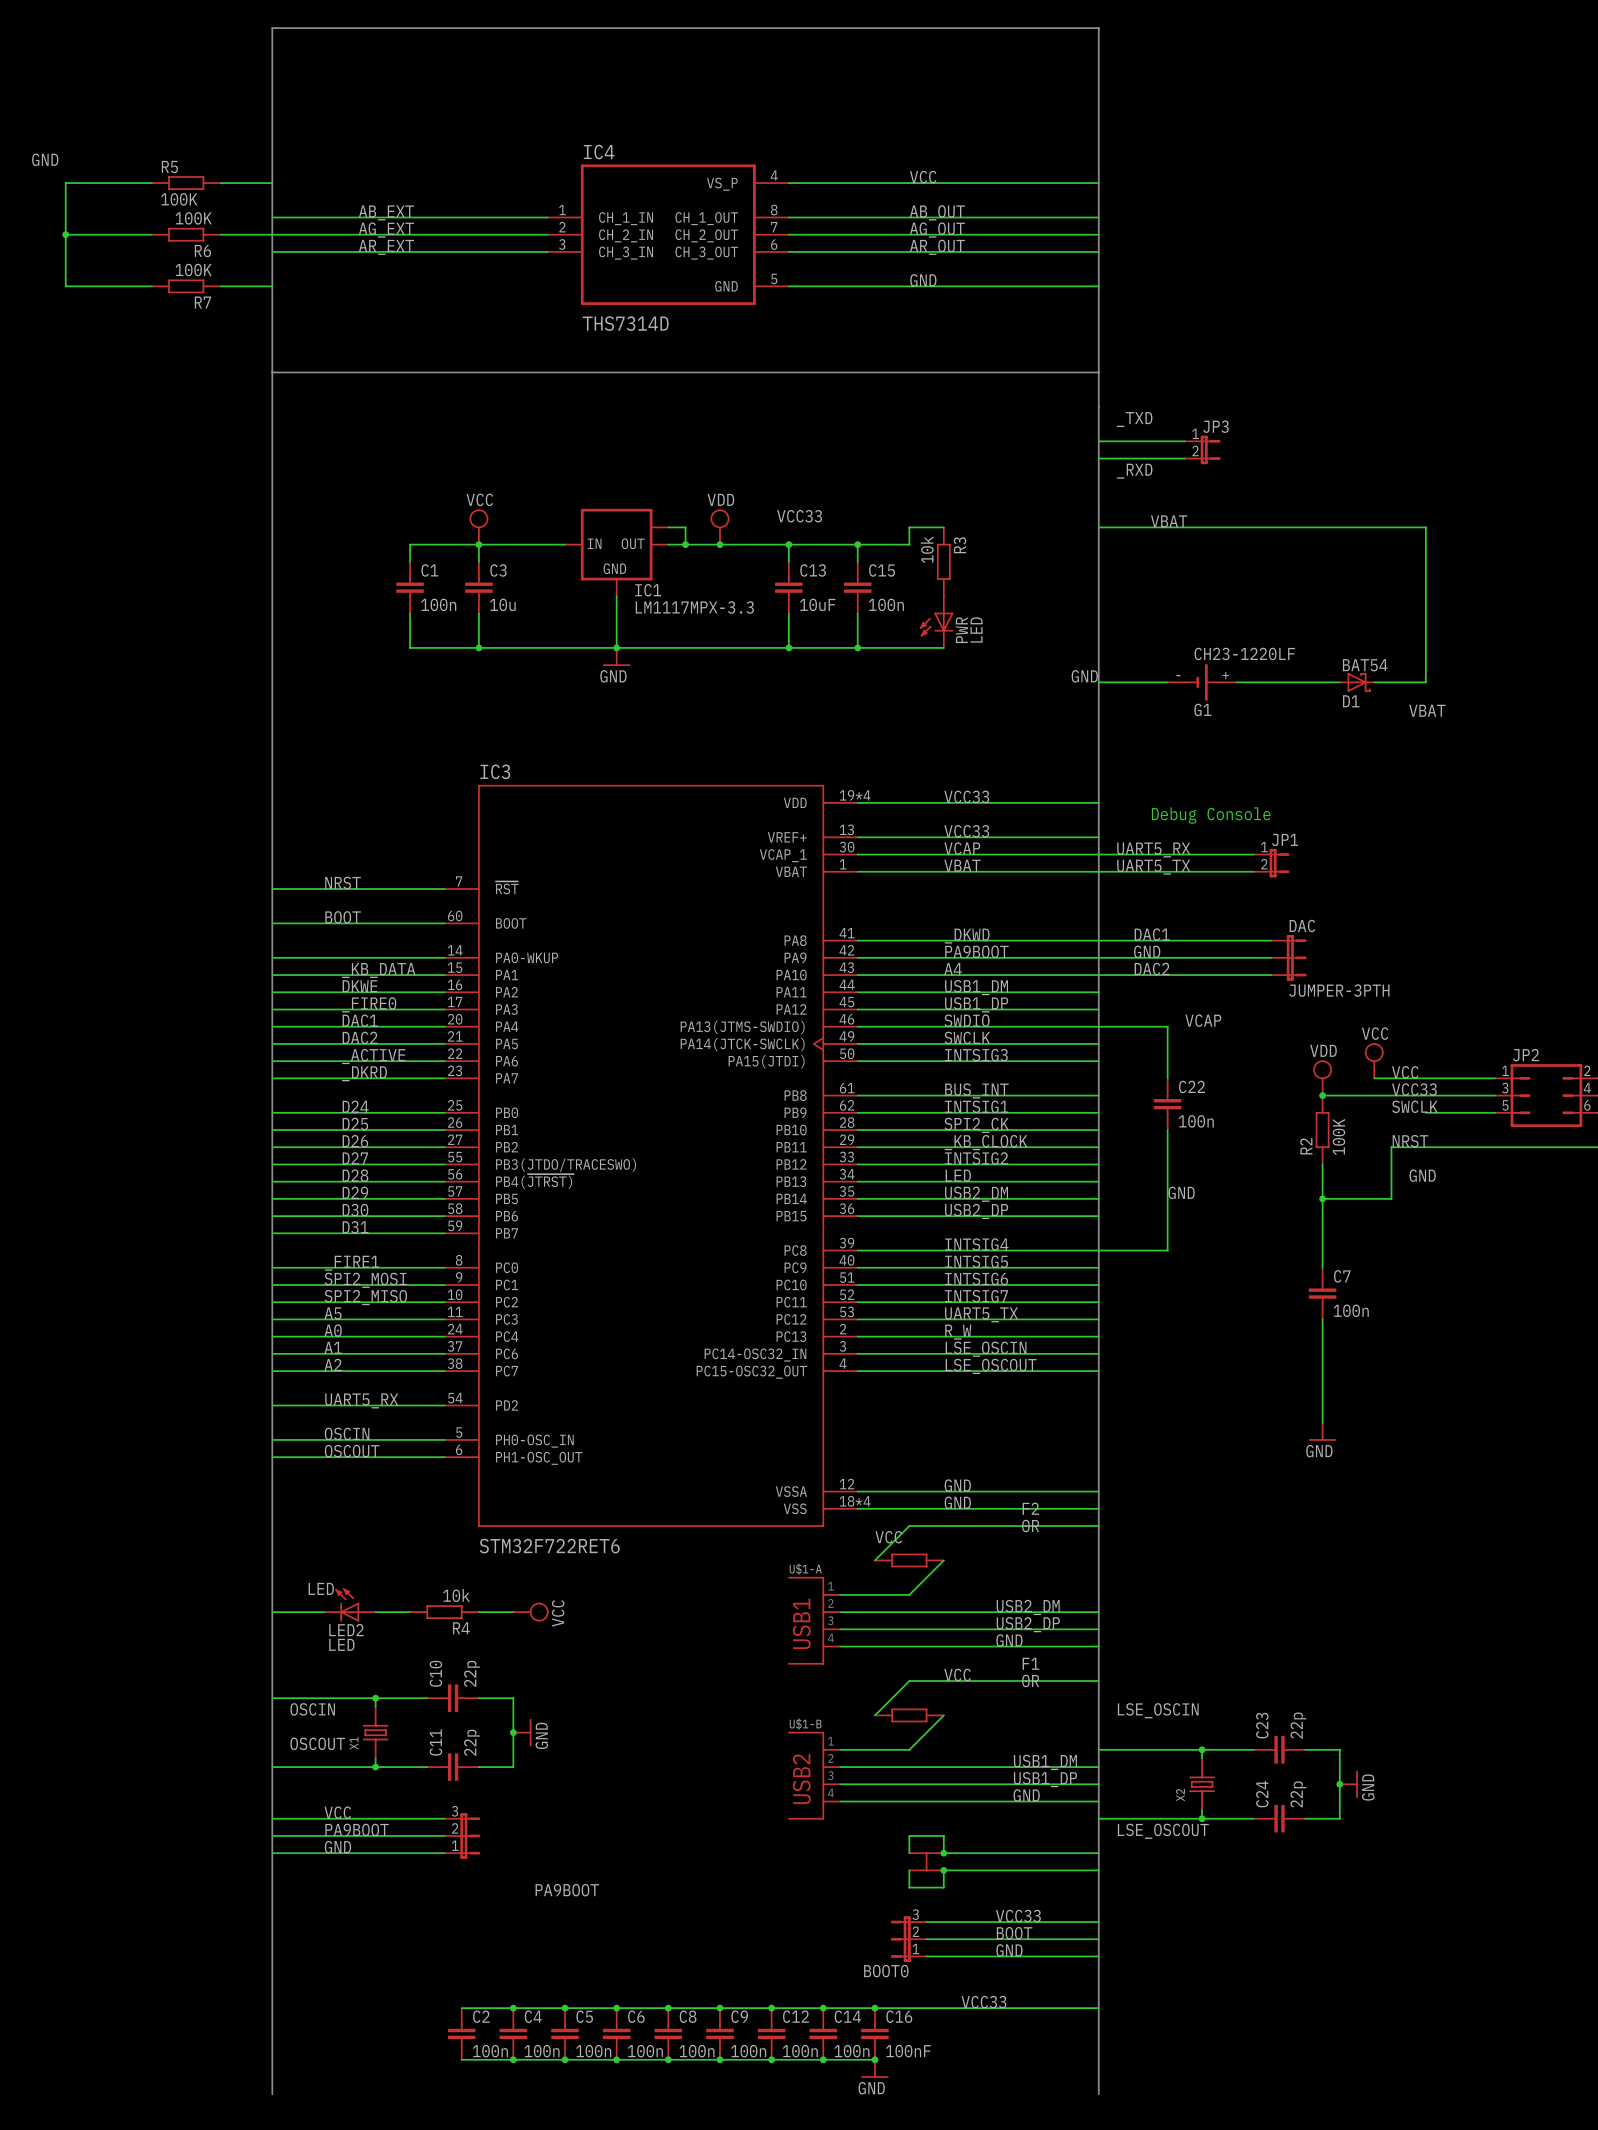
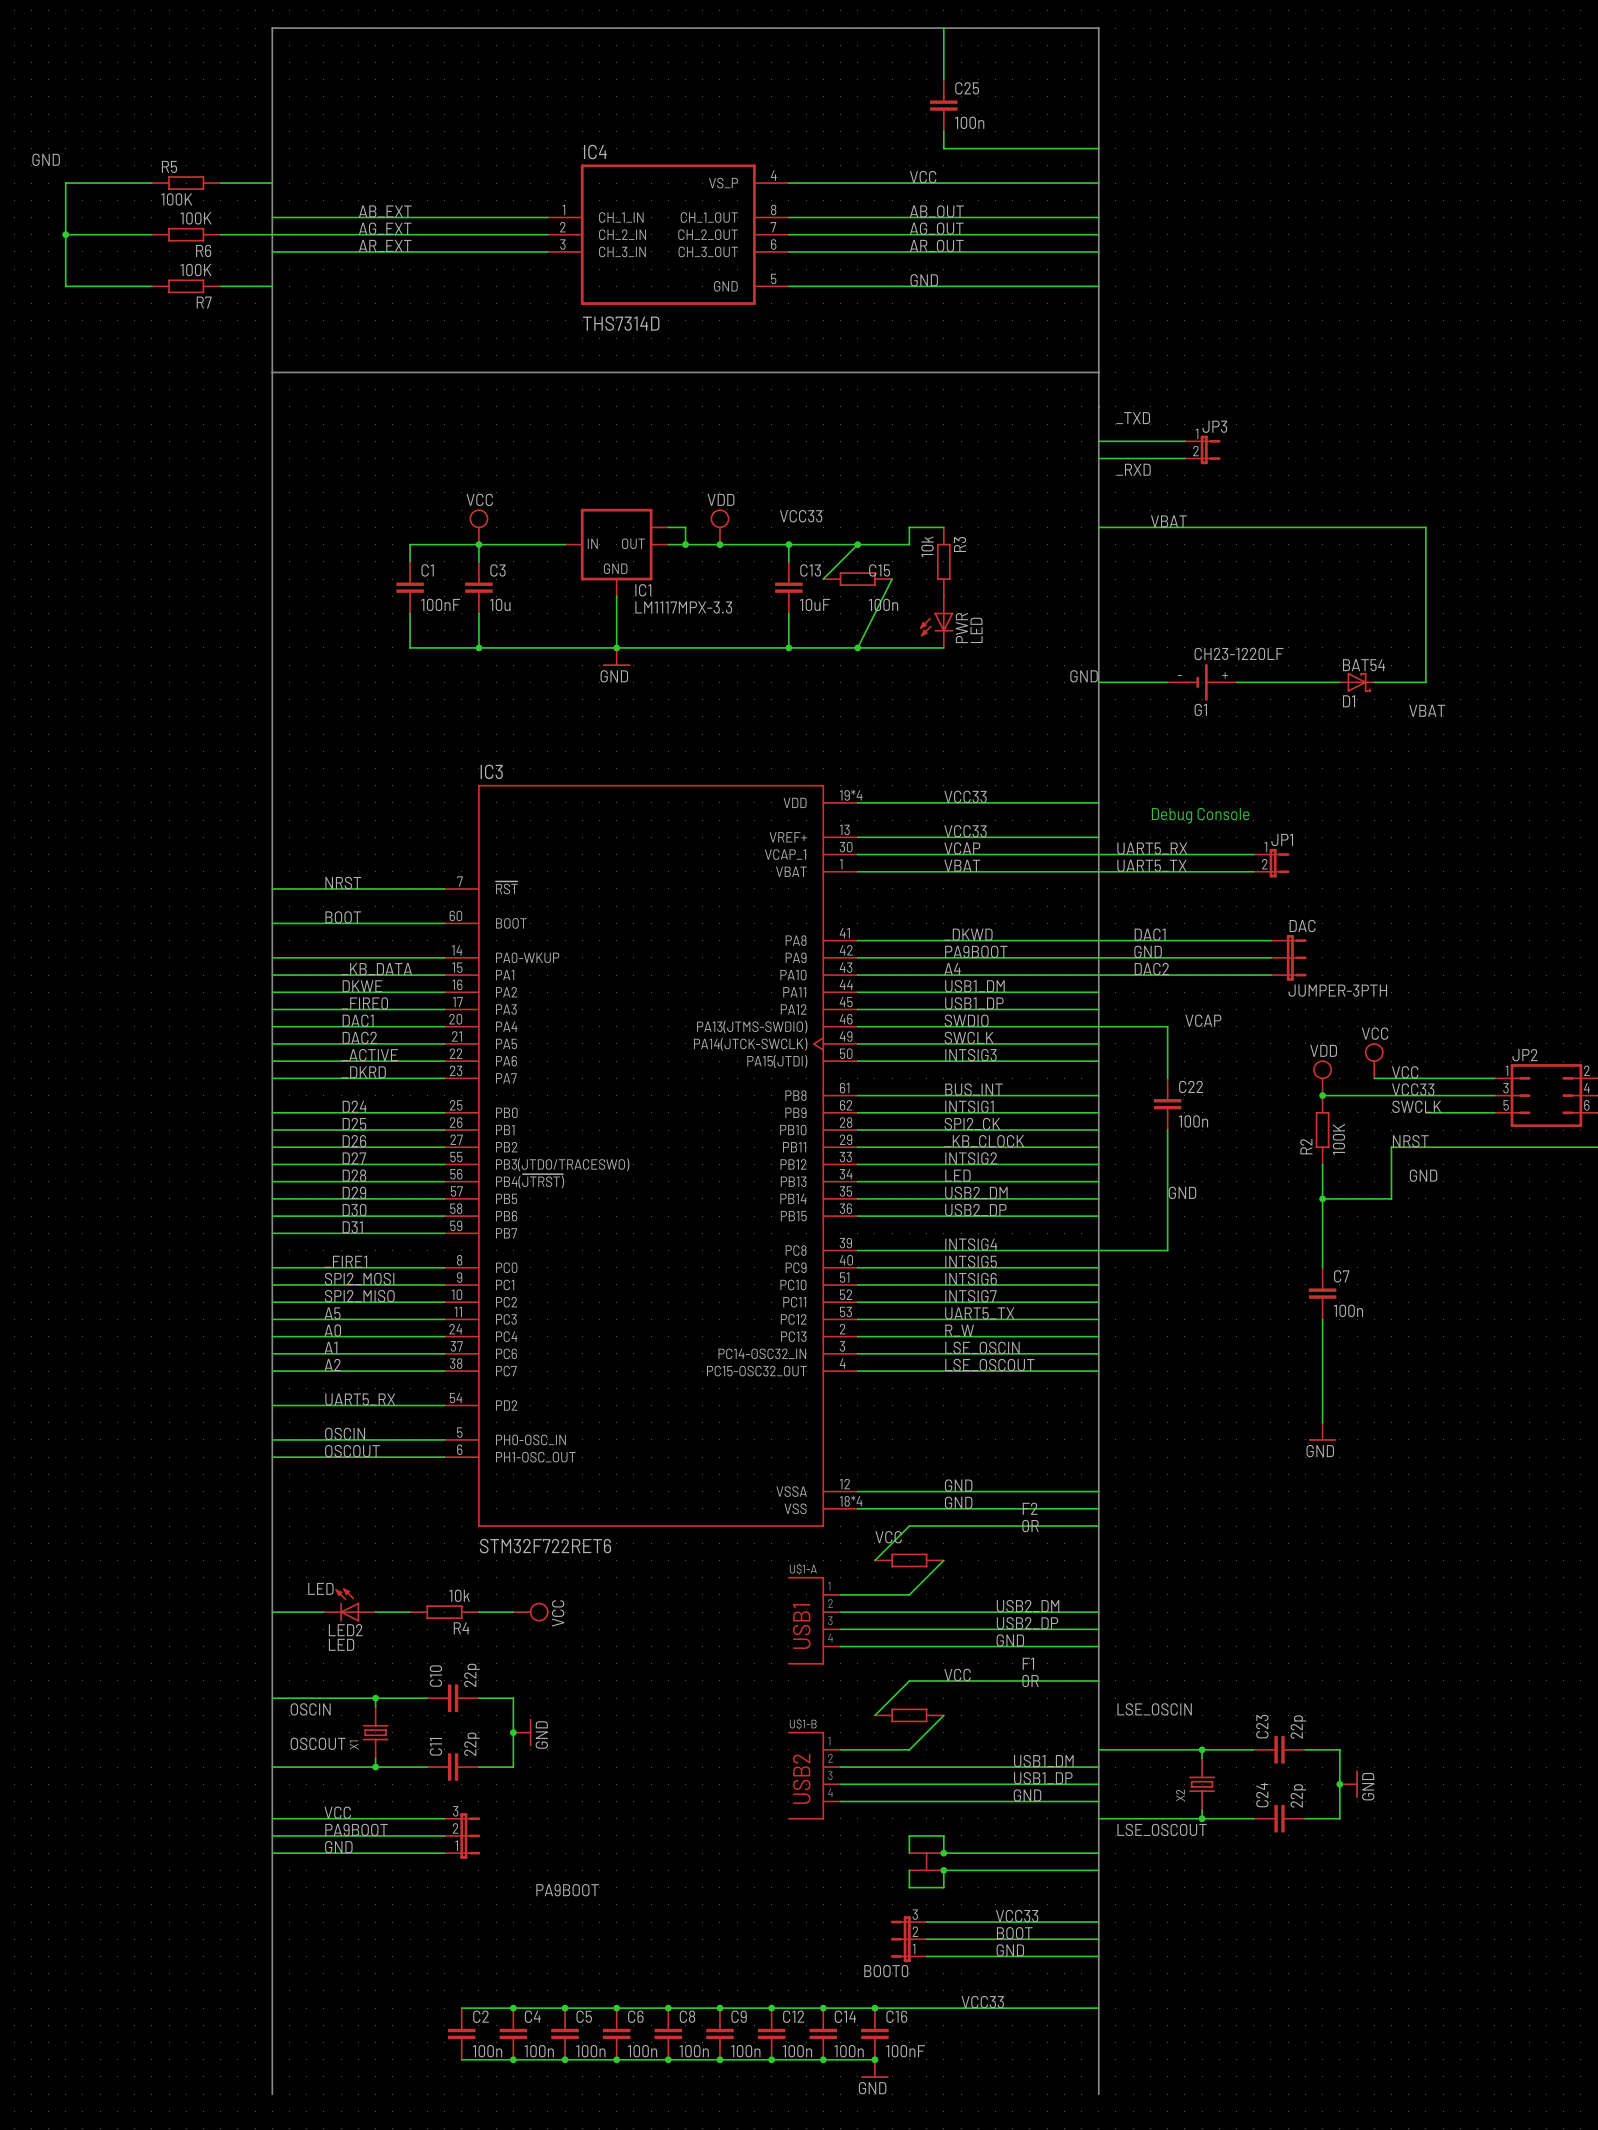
wire: none -> (943, 28) (943, 79)
C25: none -> 100n (943, 105)
wire: none -> (943, 131) (943, 148) (1098, 148)
wire: (857, 544) (857, 561) -> (857, 544) (823, 579)
C15 symbol: [843, 561, 872, 614] -> [823, 572, 893, 586]
C1 value: 100n (438, 604) -> 100nF (440, 604)
wire: (857, 613) (857, 647) -> (892, 579) (857, 647)

